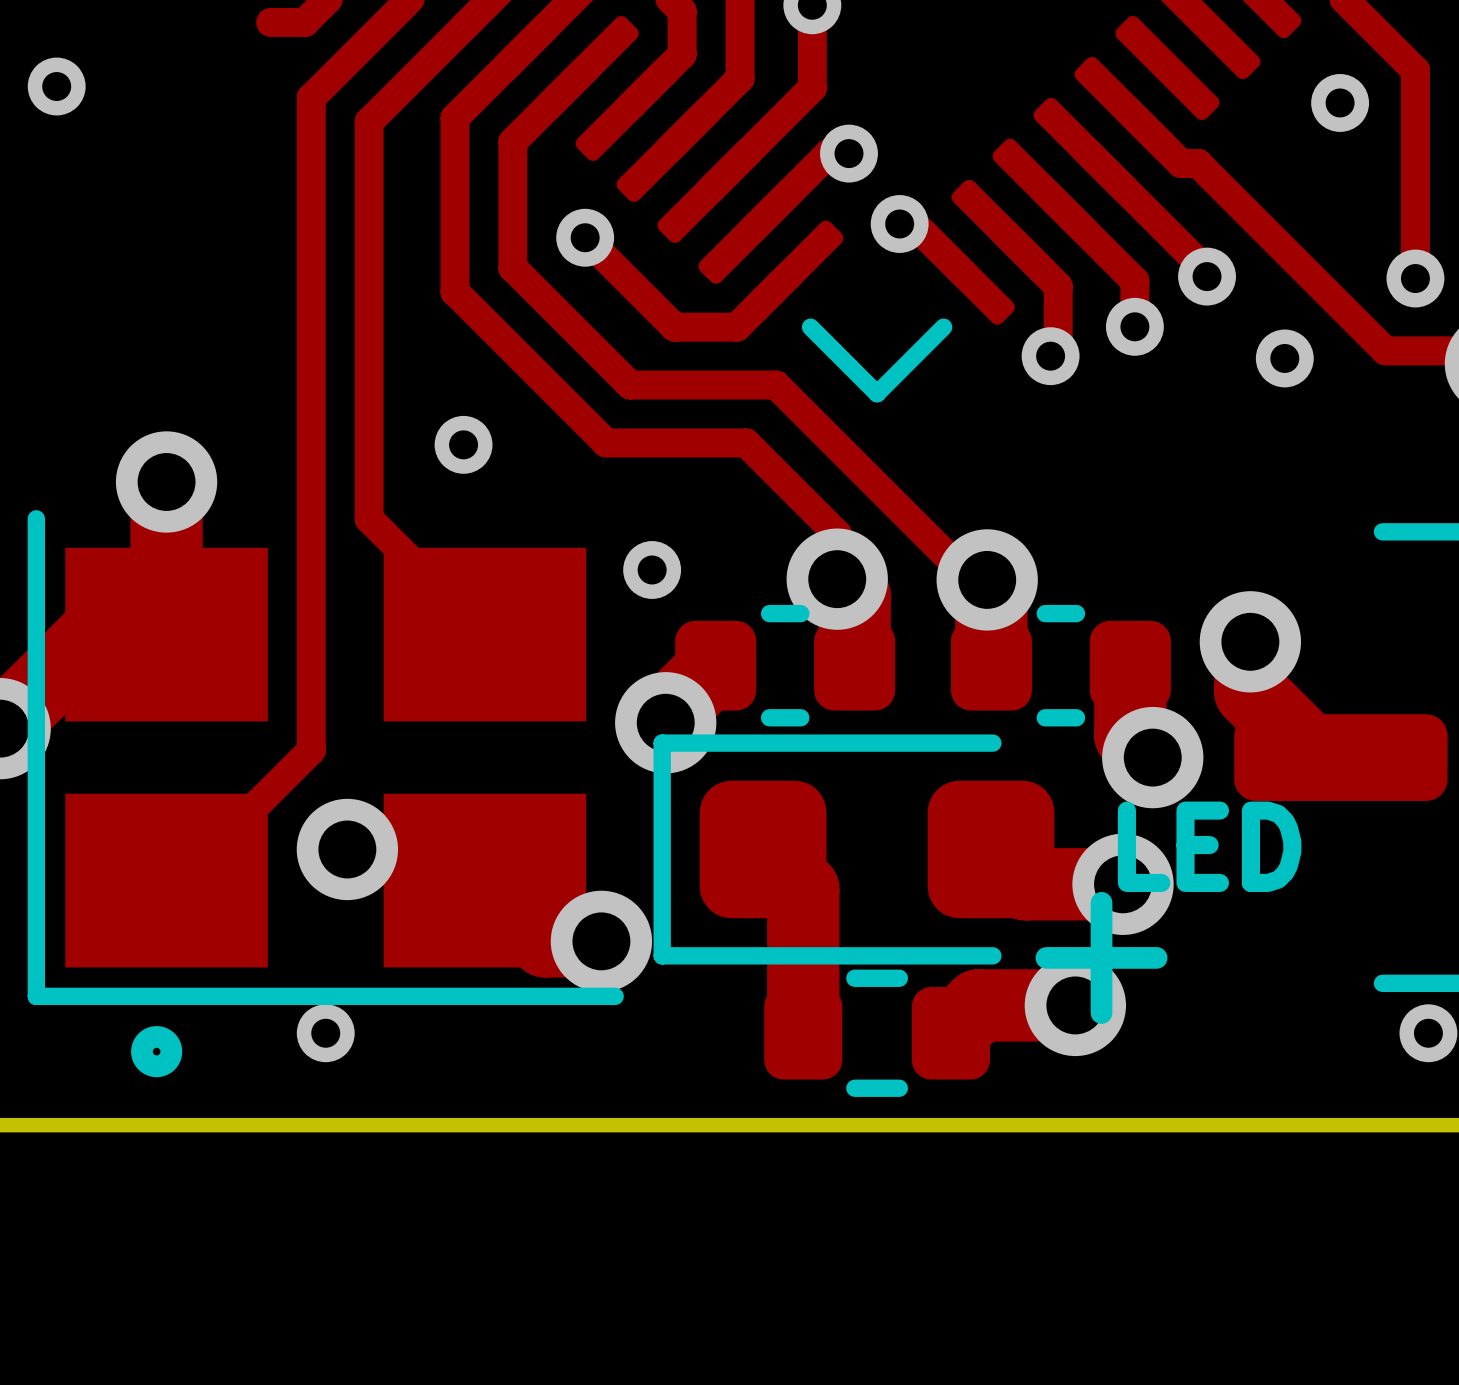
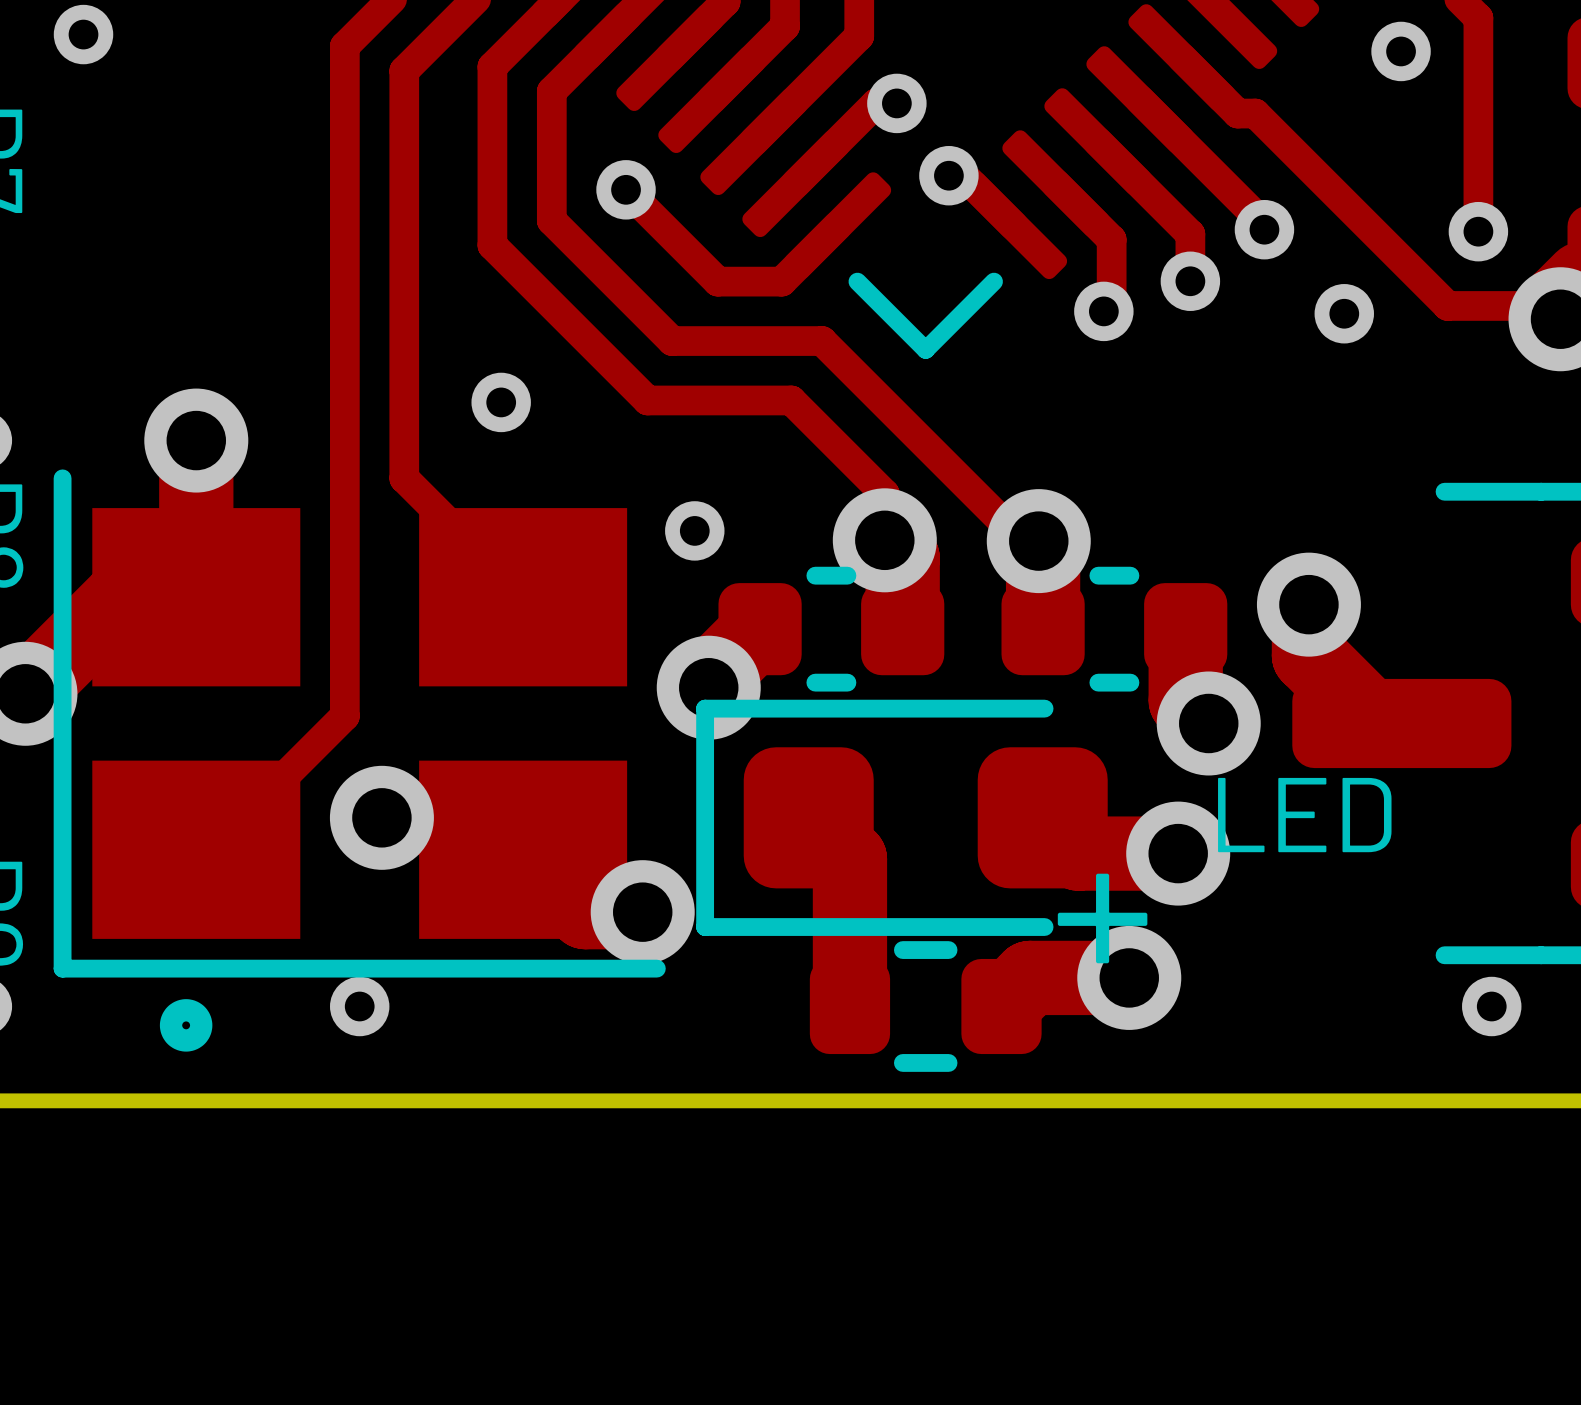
text position: LED (1209, 846) -> LED (1304, 815)

